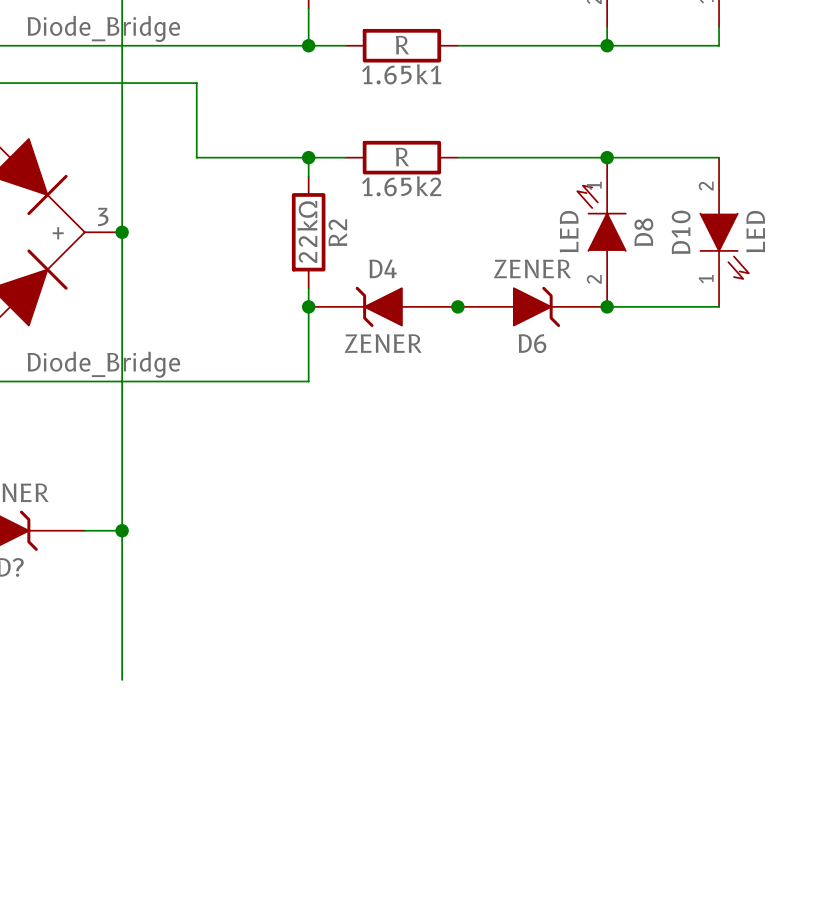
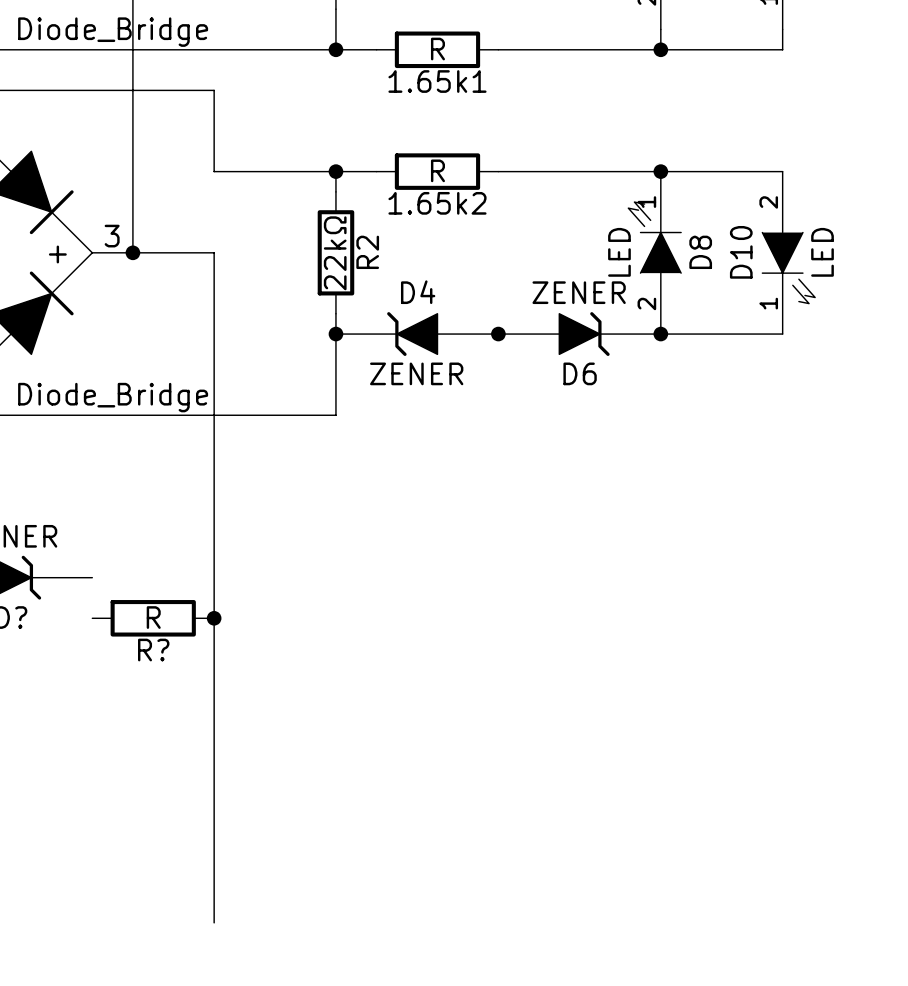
wire: (122, 232) (122, 679) -> (132, 252) (214, 252) (214, 922)
wire: (84, 530) (122, 530) -> none
junction position: (122, 530) -> (214, 618)
R?: none -> R (153, 618)

